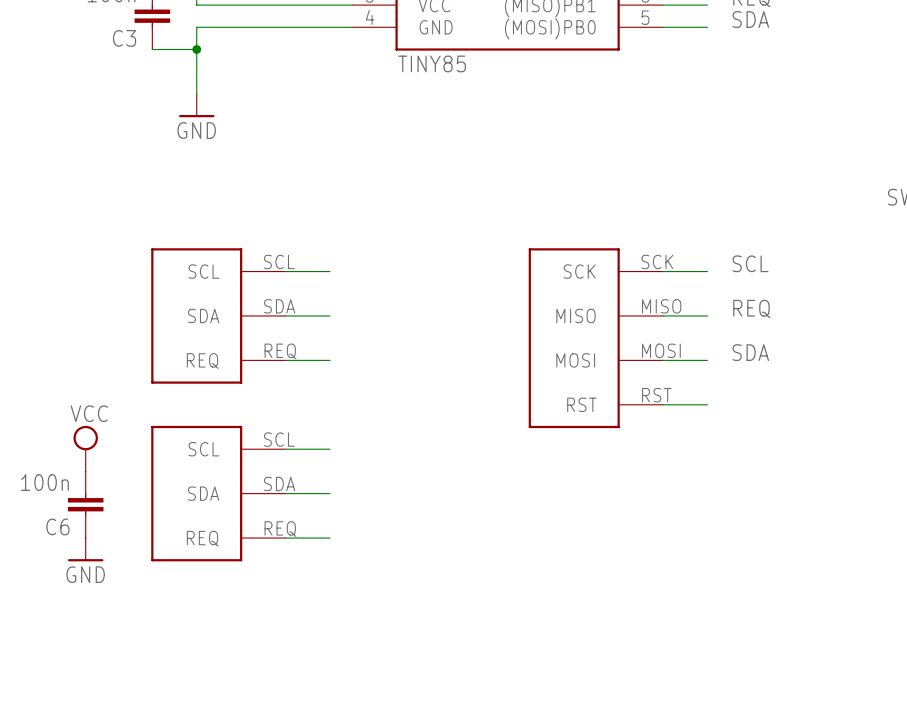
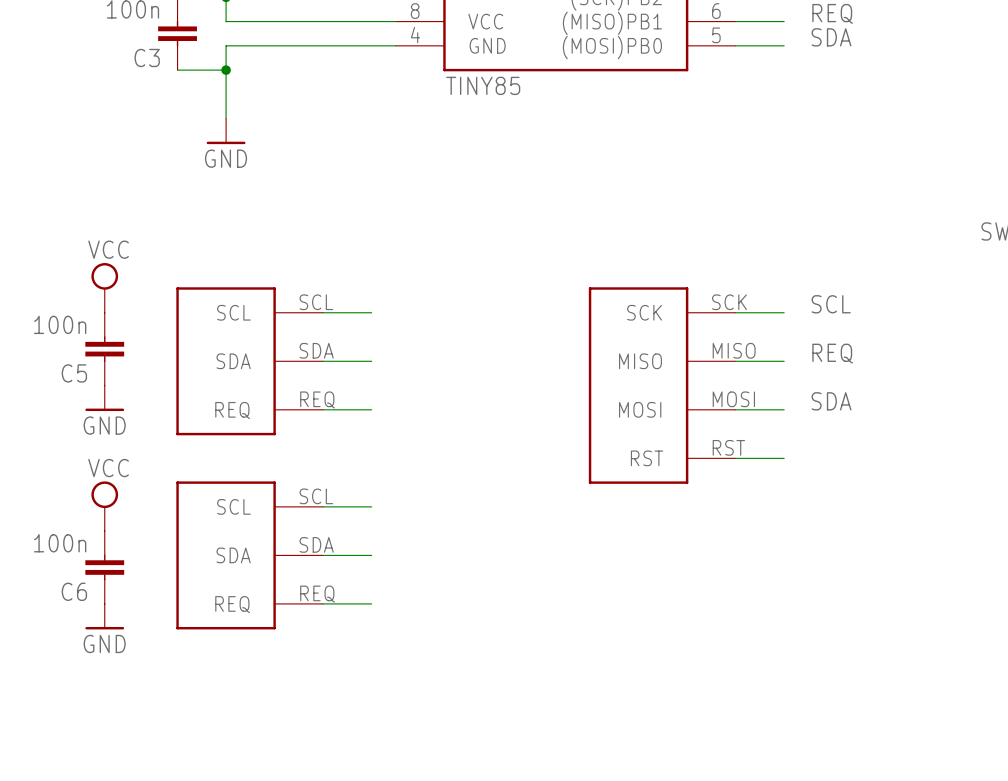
power symbol: none -> VCC (104, 287)
C5: none -> 100n (104, 349)
power symbol: none -> GND (104, 398)

